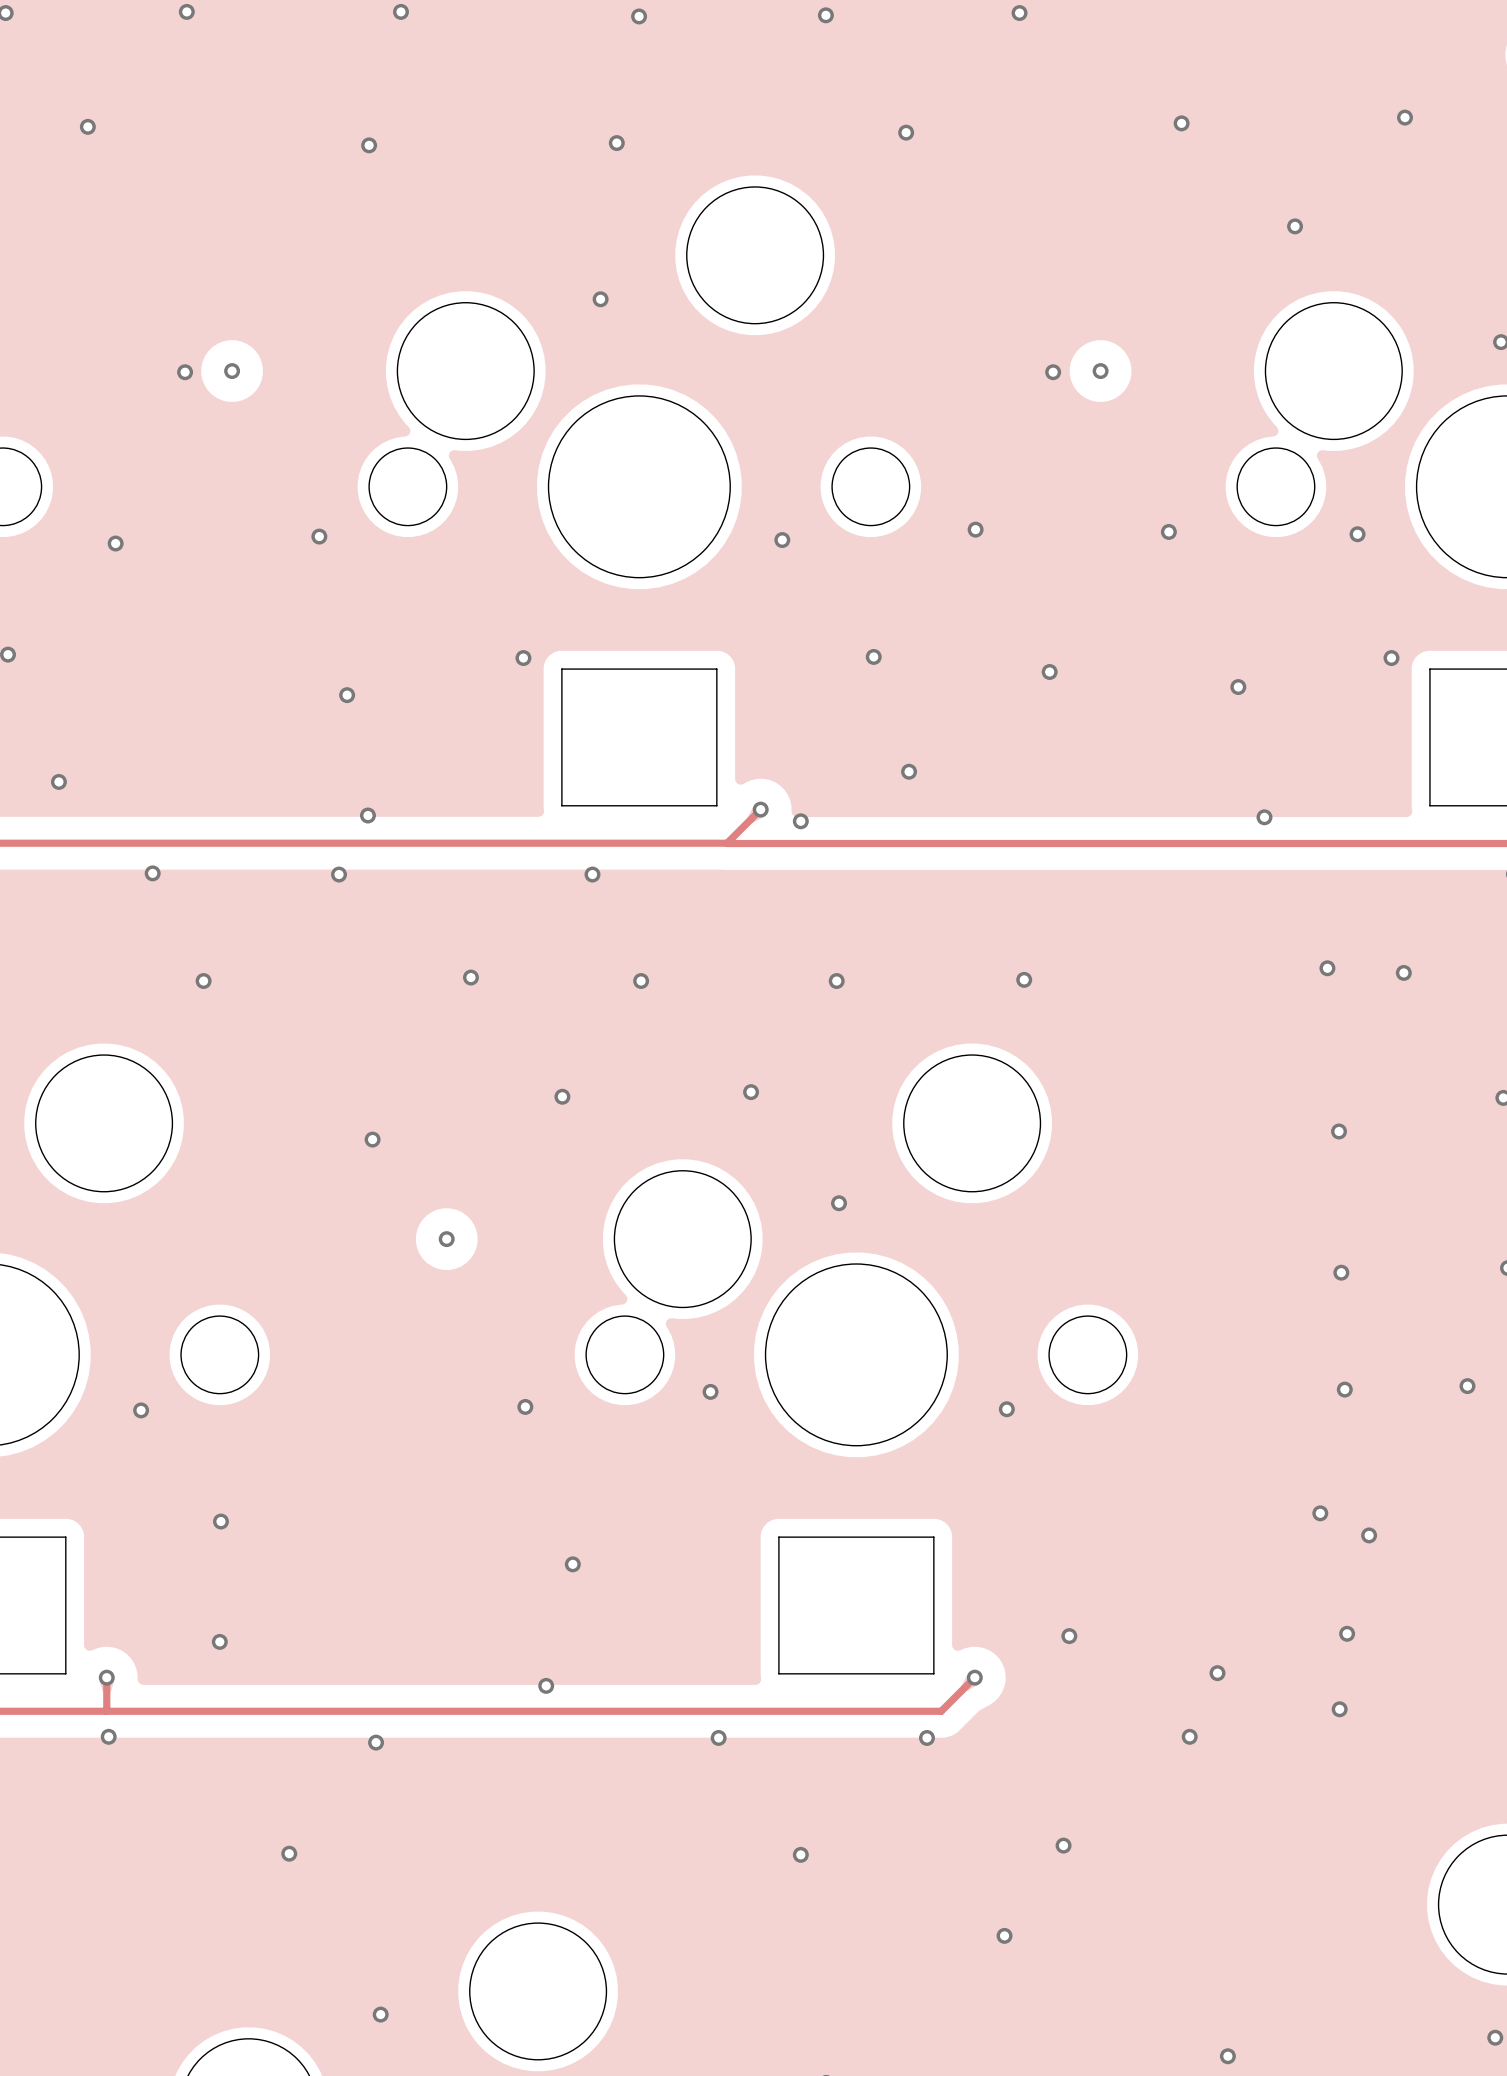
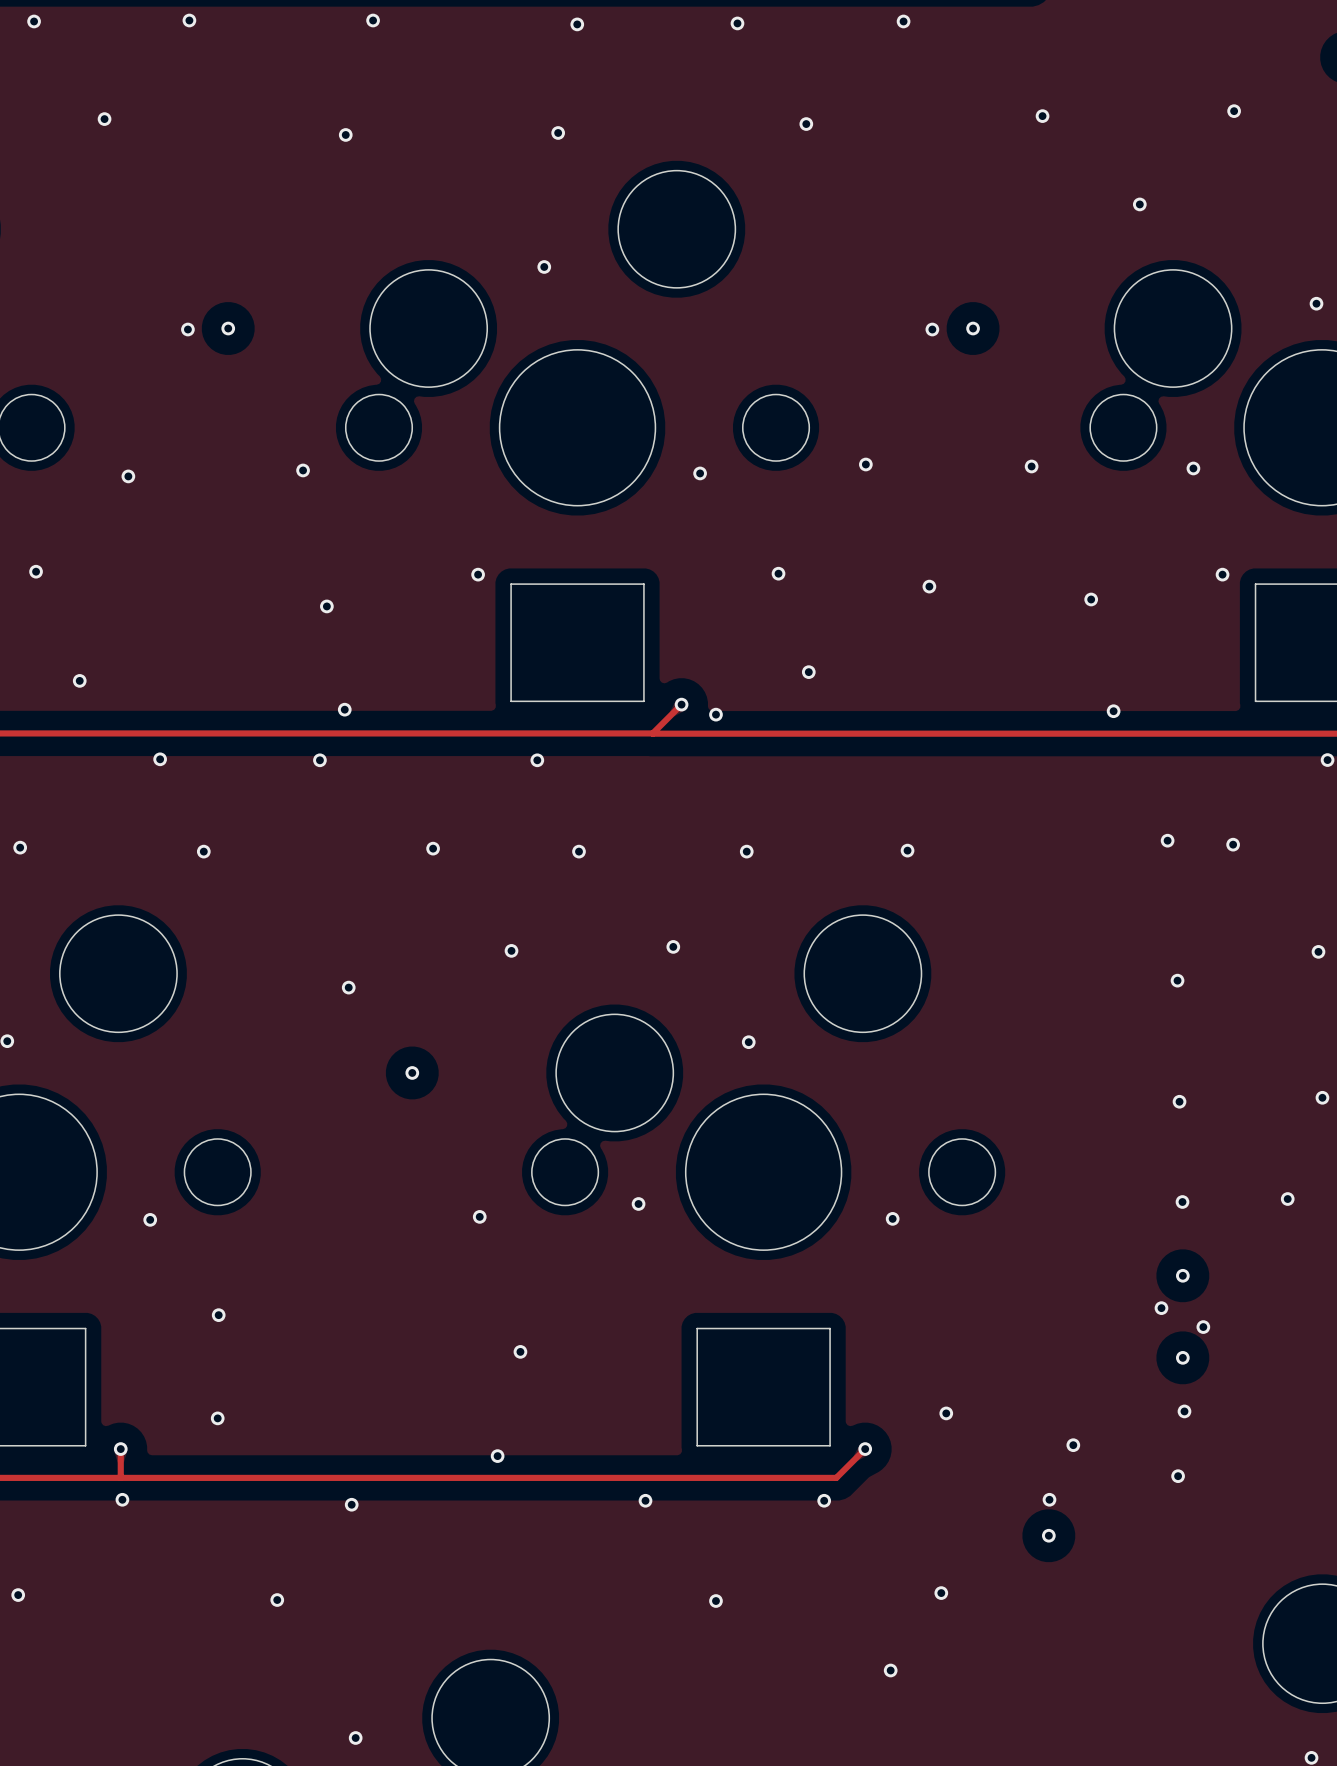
via: none -> (1182, 1275)
via: none -> (1182, 1357)
via: none -> (1048, 1535)

